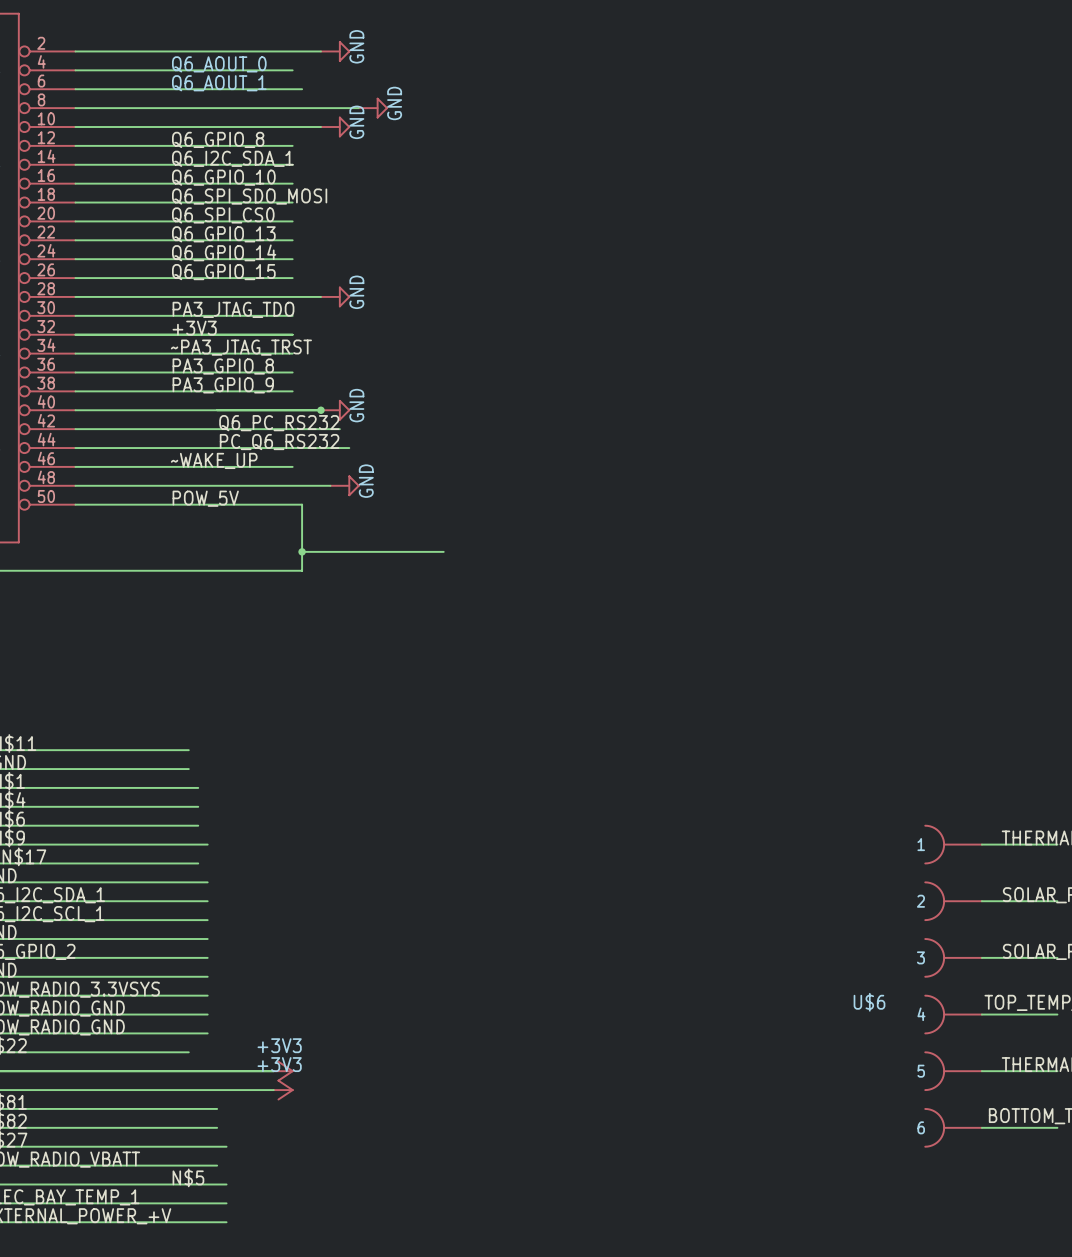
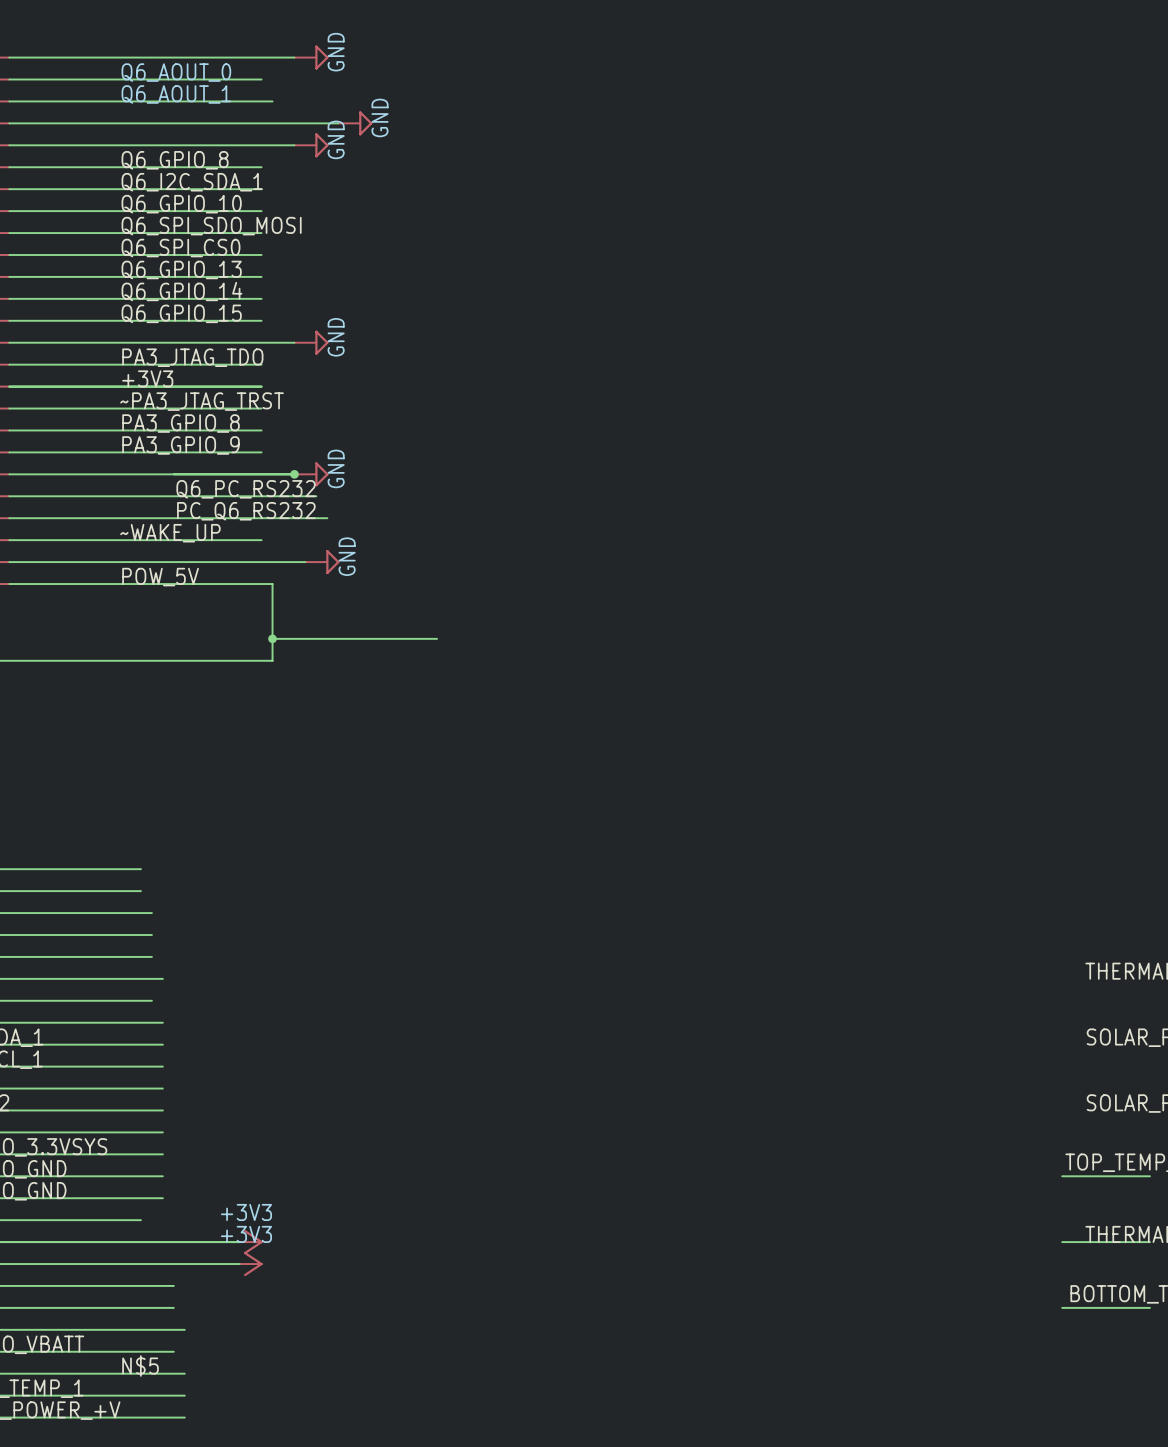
wire: (981, 844) (1057, 844) -> none
wire: (981, 901) (1057, 901) -> none
wire: (981, 957) (1057, 957) -> none
U$6: (953, 986) -> none

